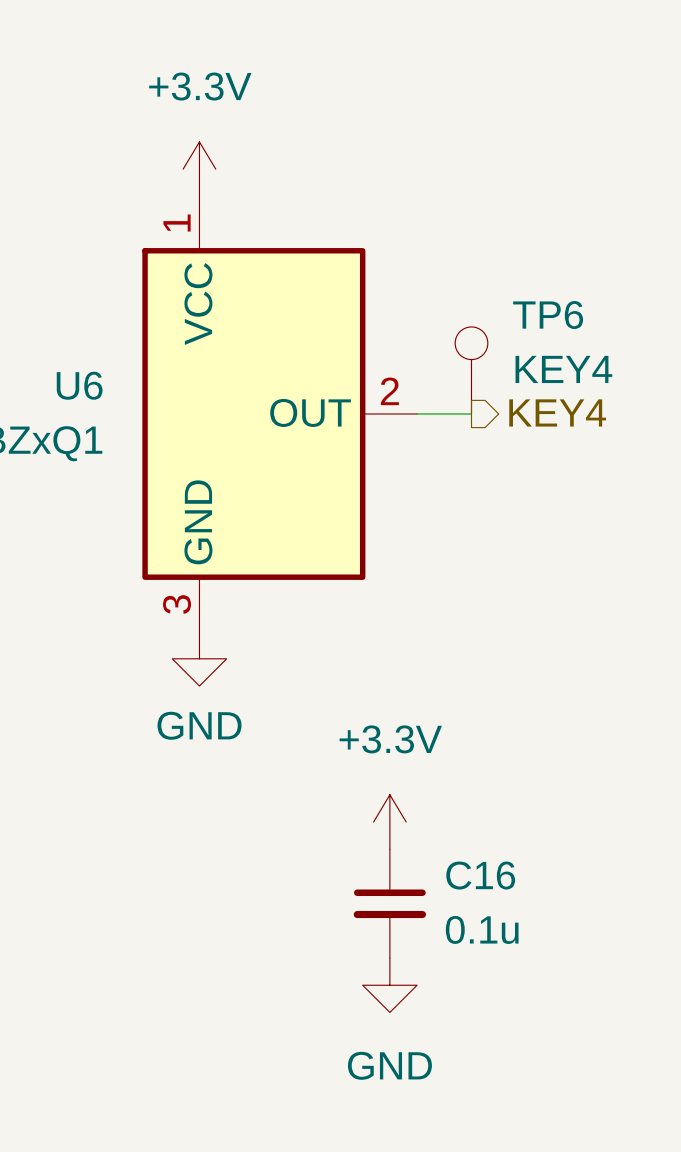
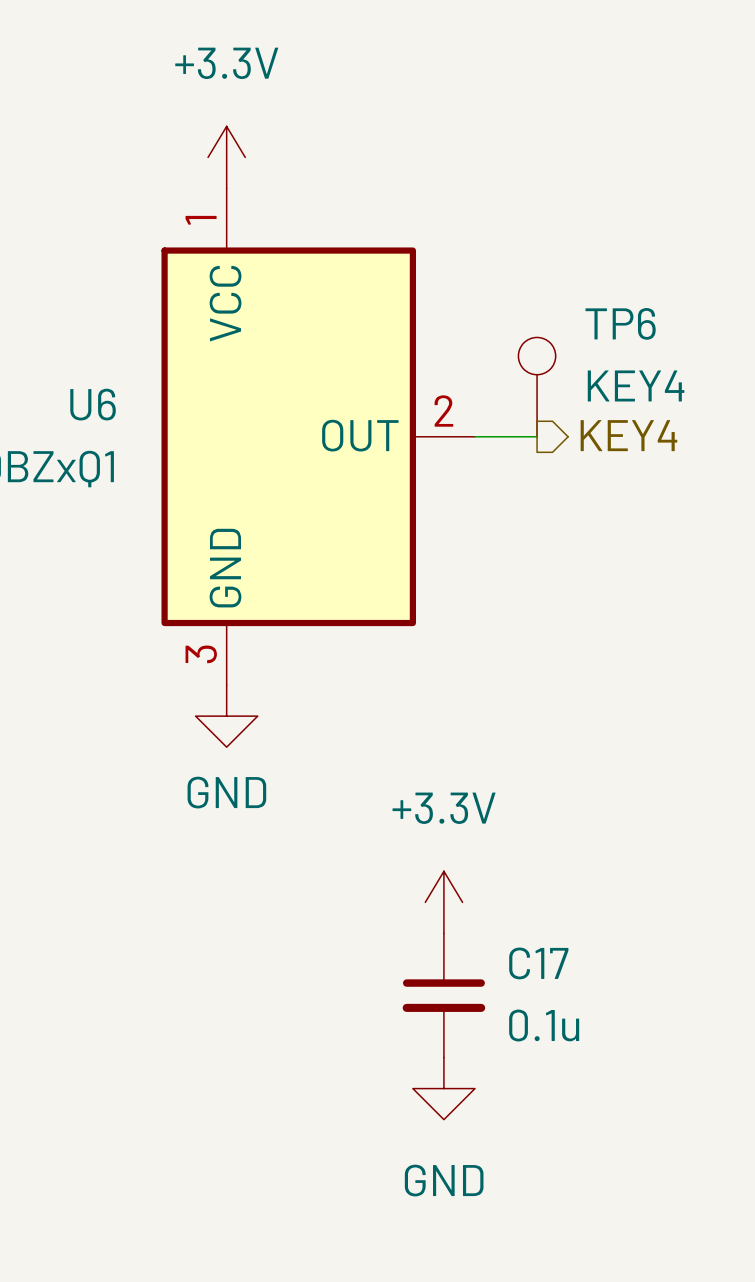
C16 name: C16 (480, 875) -> C17 (538, 963)

